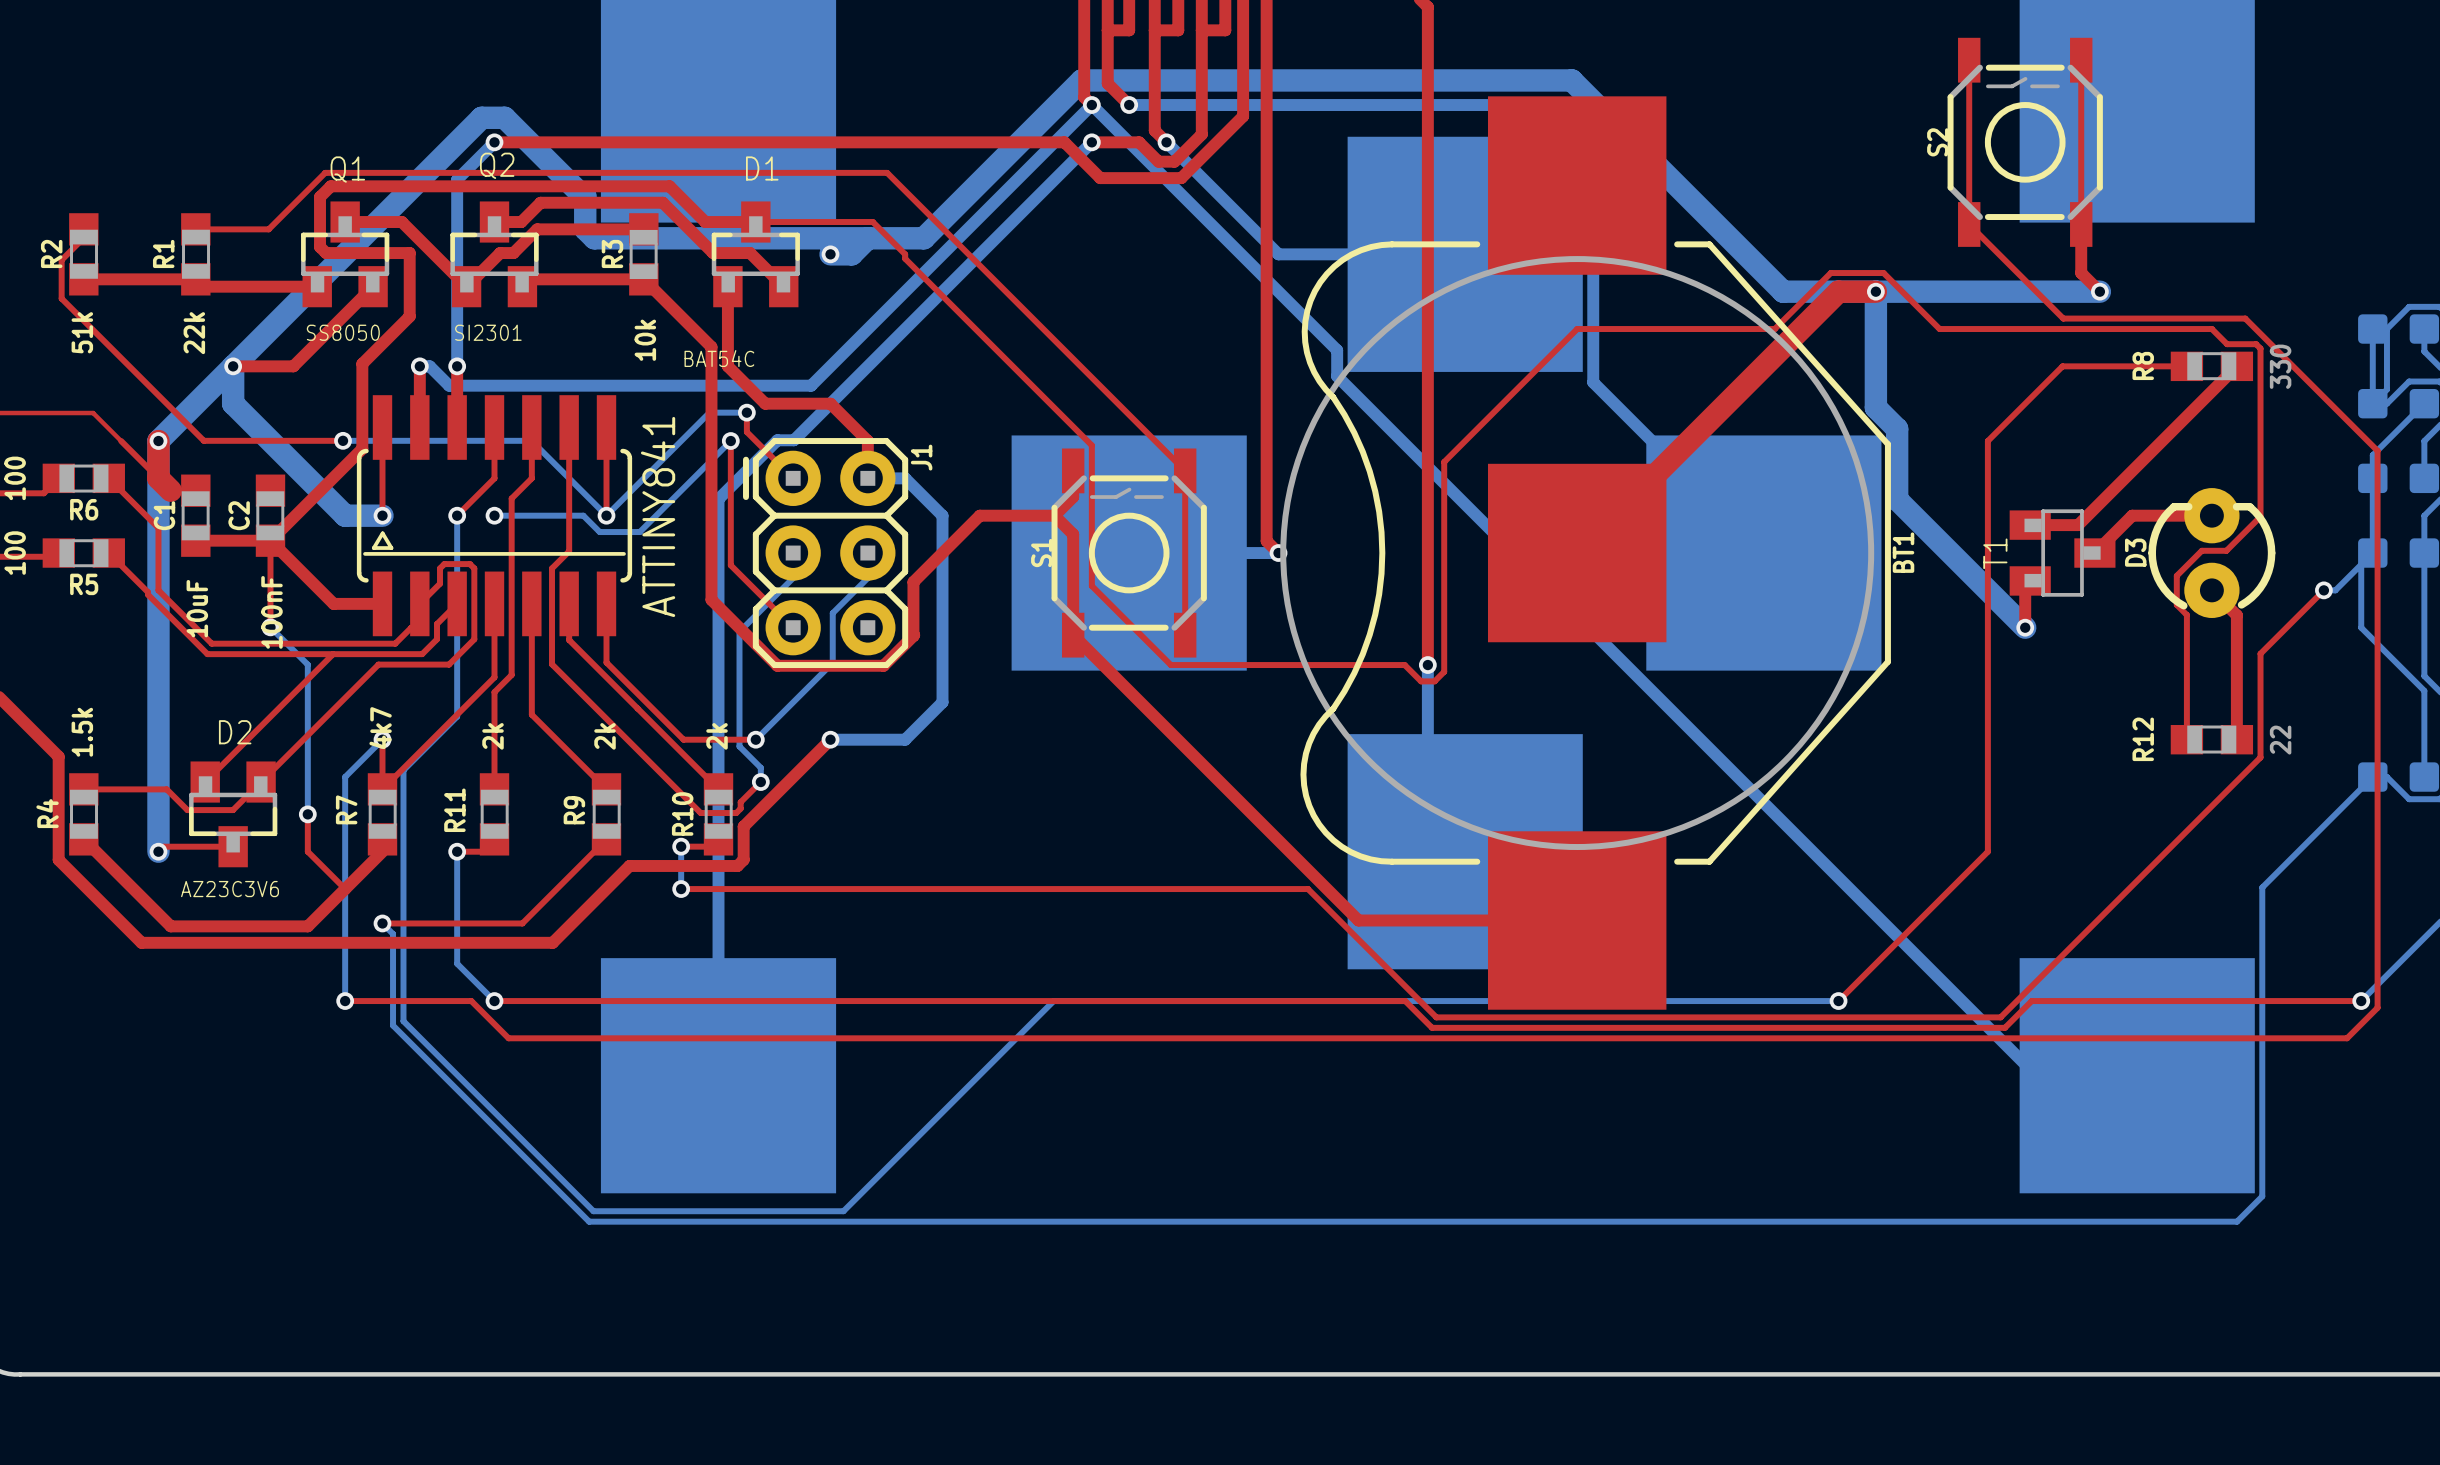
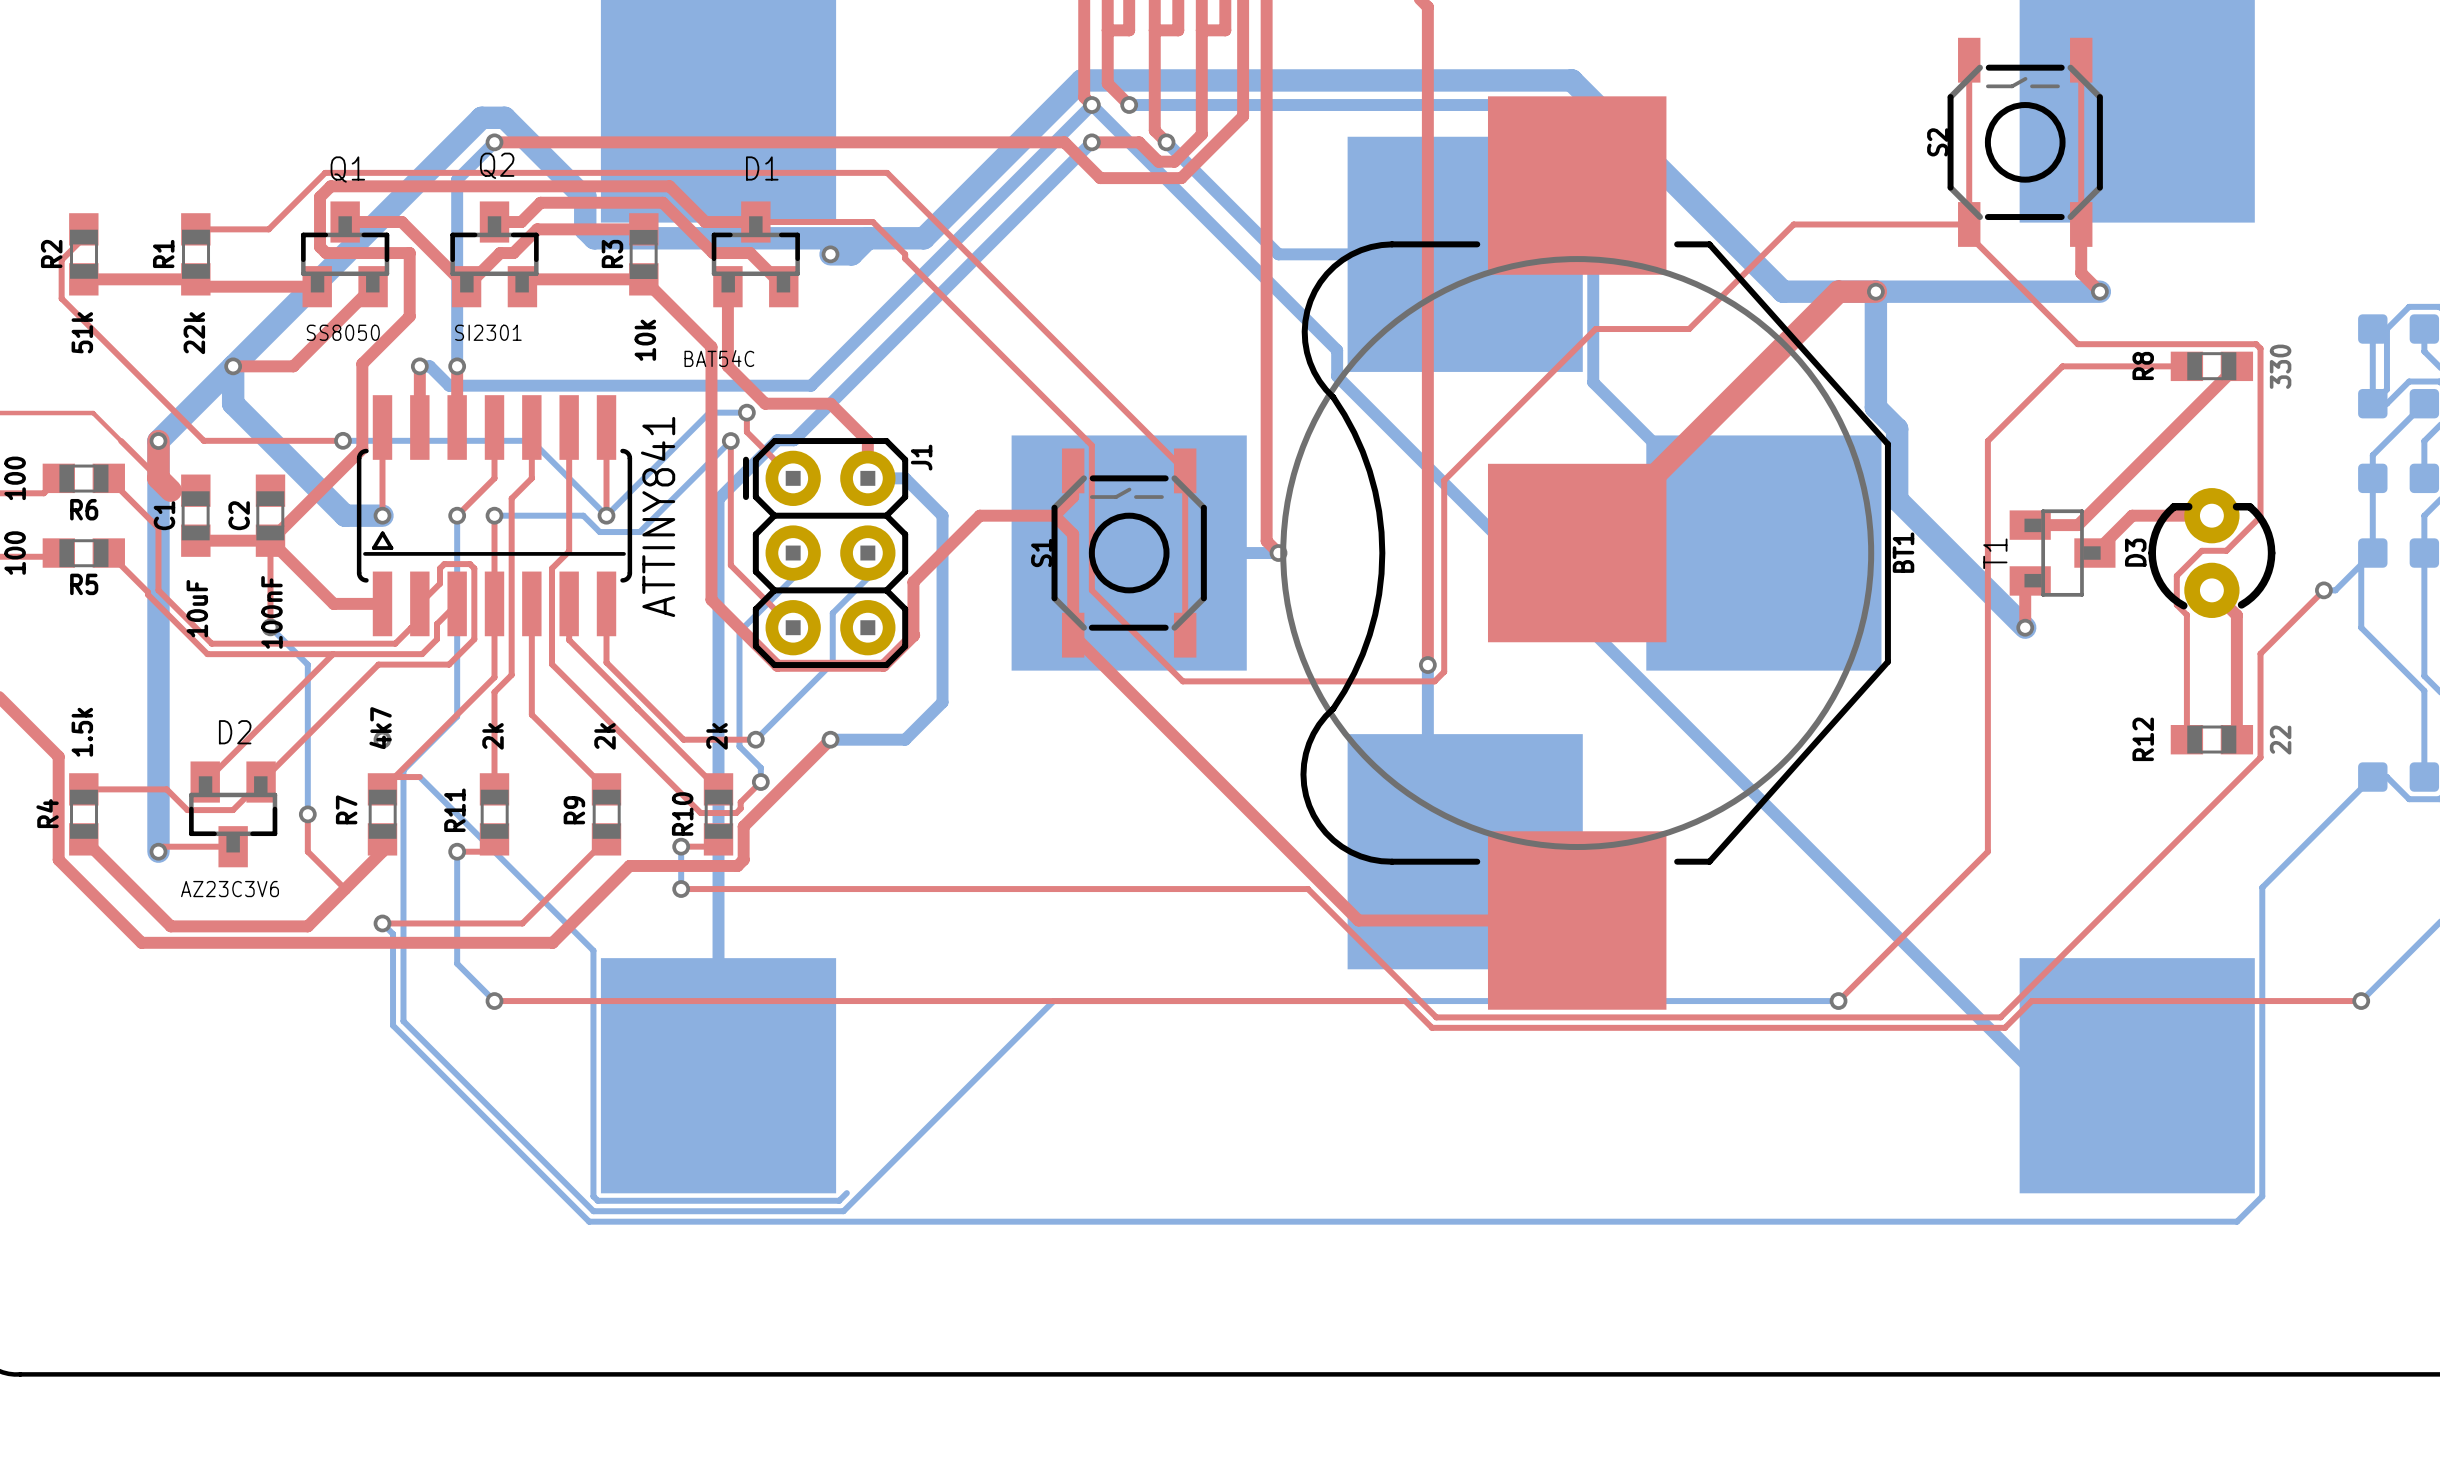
top track: (1969, 224) (2063, 318) (2245, 318) (2377, 450) (2377, 1007) (2347, 1038) (508, 1038) (471, 1001) (345, 1001) -> none
top track: (1595, 329) (1577, 329) (1444, 462) (1444, 480) -> (1595, 329) (1444, 480)
top track: (1689, 329) (1774, 329) (1830, 273) (1883, 273) (1939, 329) (2211, 329) (2227, 344) -> (1689, 329) (1793, 224) (1969, 224) (1969, 235) (2077, 344) (2227, 344)
top track: none -> (494, 515) (494, 603)
top track: (1091, 585) (1170, 665) (1404, 665) (1421, 681) -> (1091, 585) (1091, 590) (1182, 681) (1421, 681)
top track: (382, 739) (382, 777) (388, 783) -> none
bottom track: (382, 739) (345, 777) (345, 1001) -> none
top track: none -> (394, 777) (419, 777)
bottom track: none -> (419, 777) (593, 950) (593, 1196) (597, 1200) (839, 1200) (846, 1193)
via: (345, 1001) -> none

